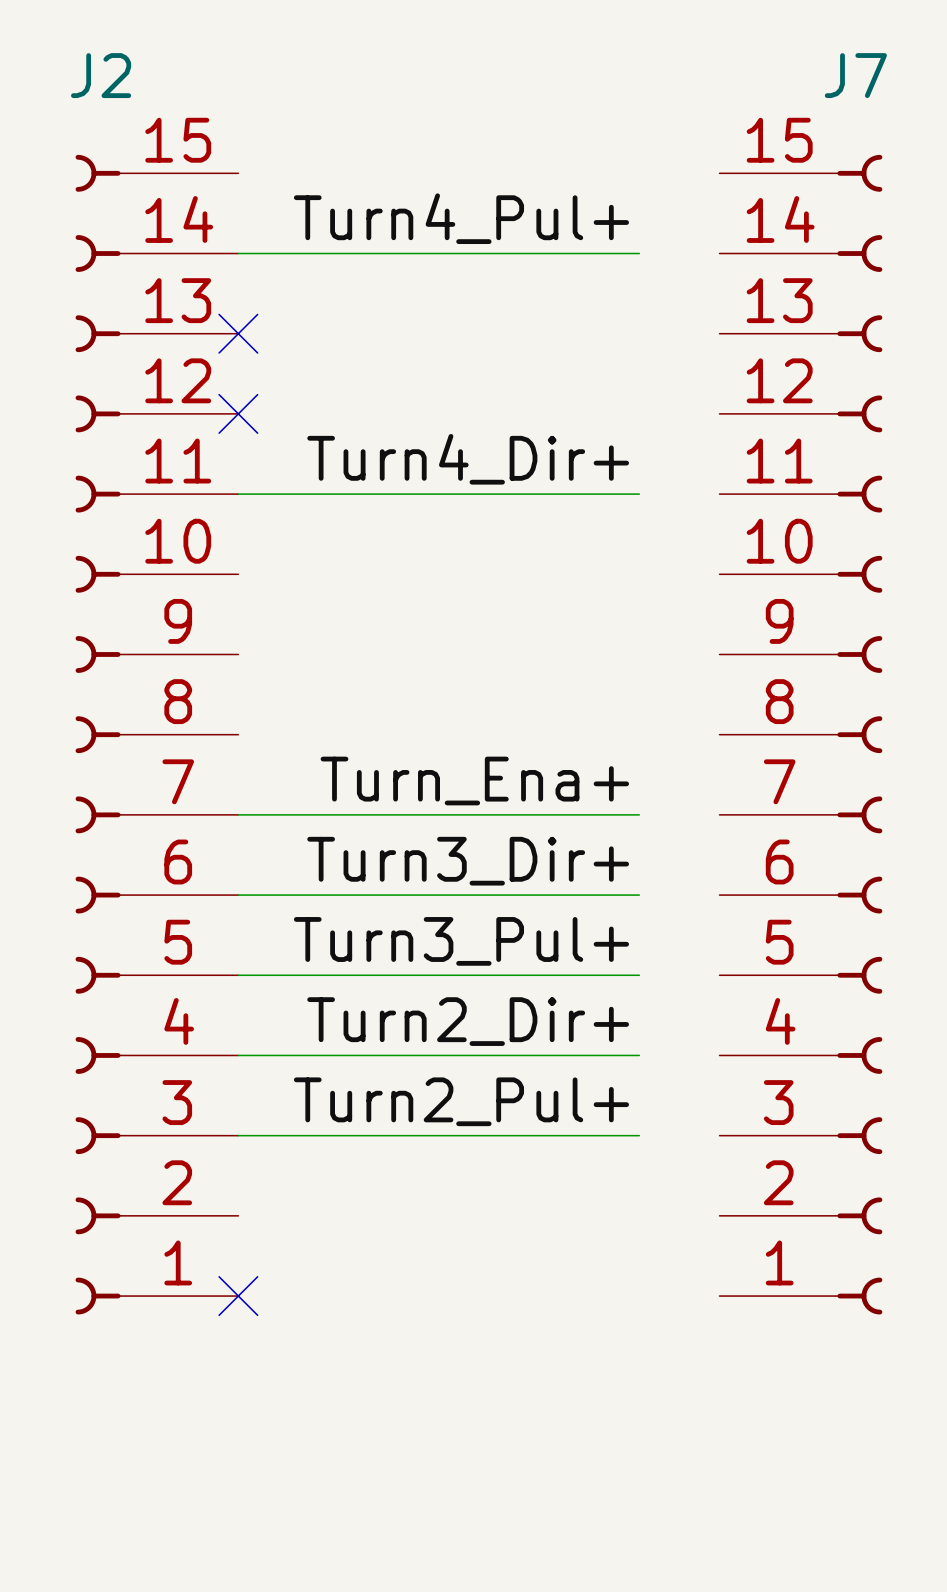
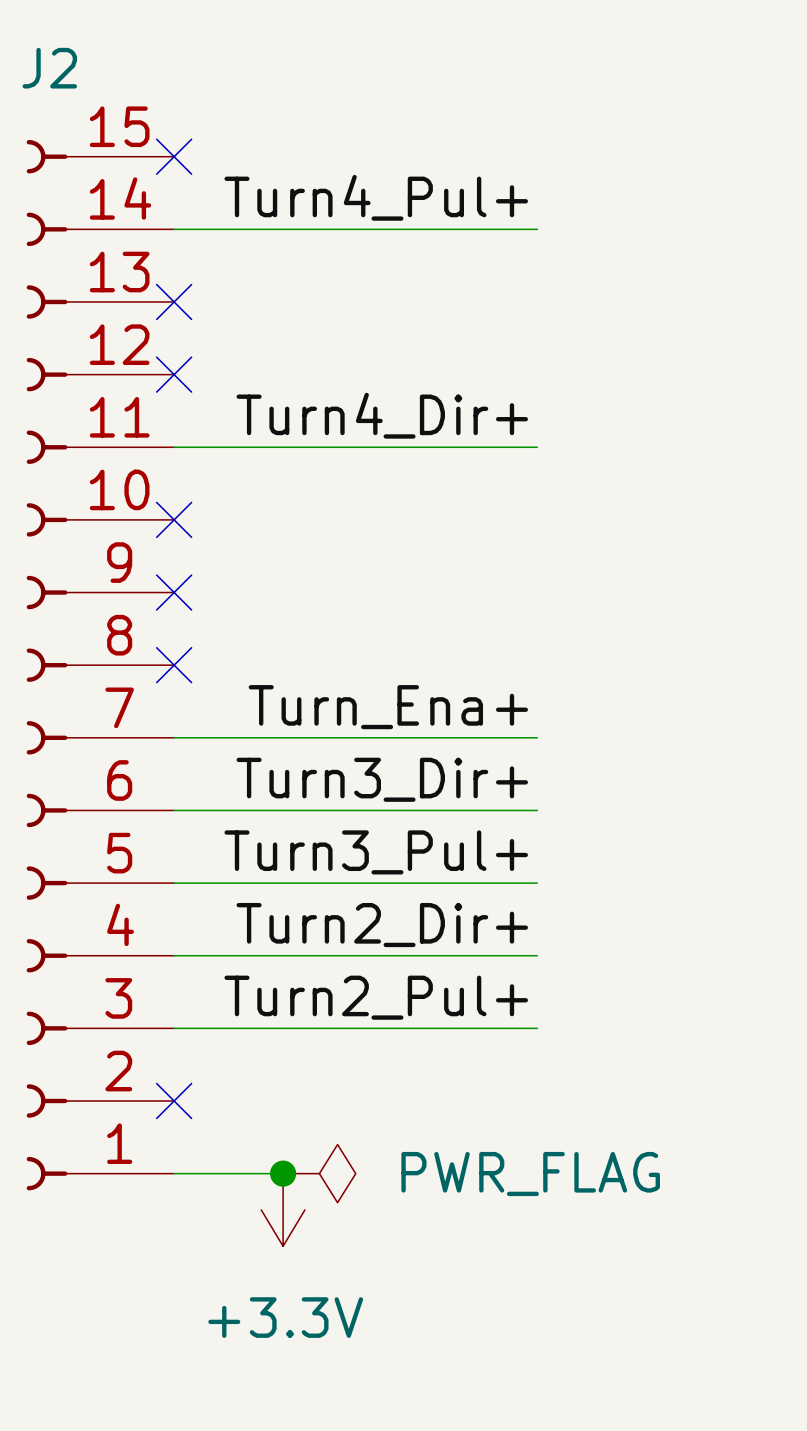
no-connect mark: none -> (174, 156)
no-connect mark: none -> (174, 519)
no-connect mark: none -> (174, 592)
no-connect mark: none -> (174, 665)
J7: (800, 734) -> none
wire: none -> (174, 1173) (283, 1173)
no-connect mark position: (238, 1296) -> (174, 1101)
junction: none -> (283, 1173)
power symbol: none -> PWR_FLAG (319, 1173)
power symbol: none -> +3.3V (283, 1209)

